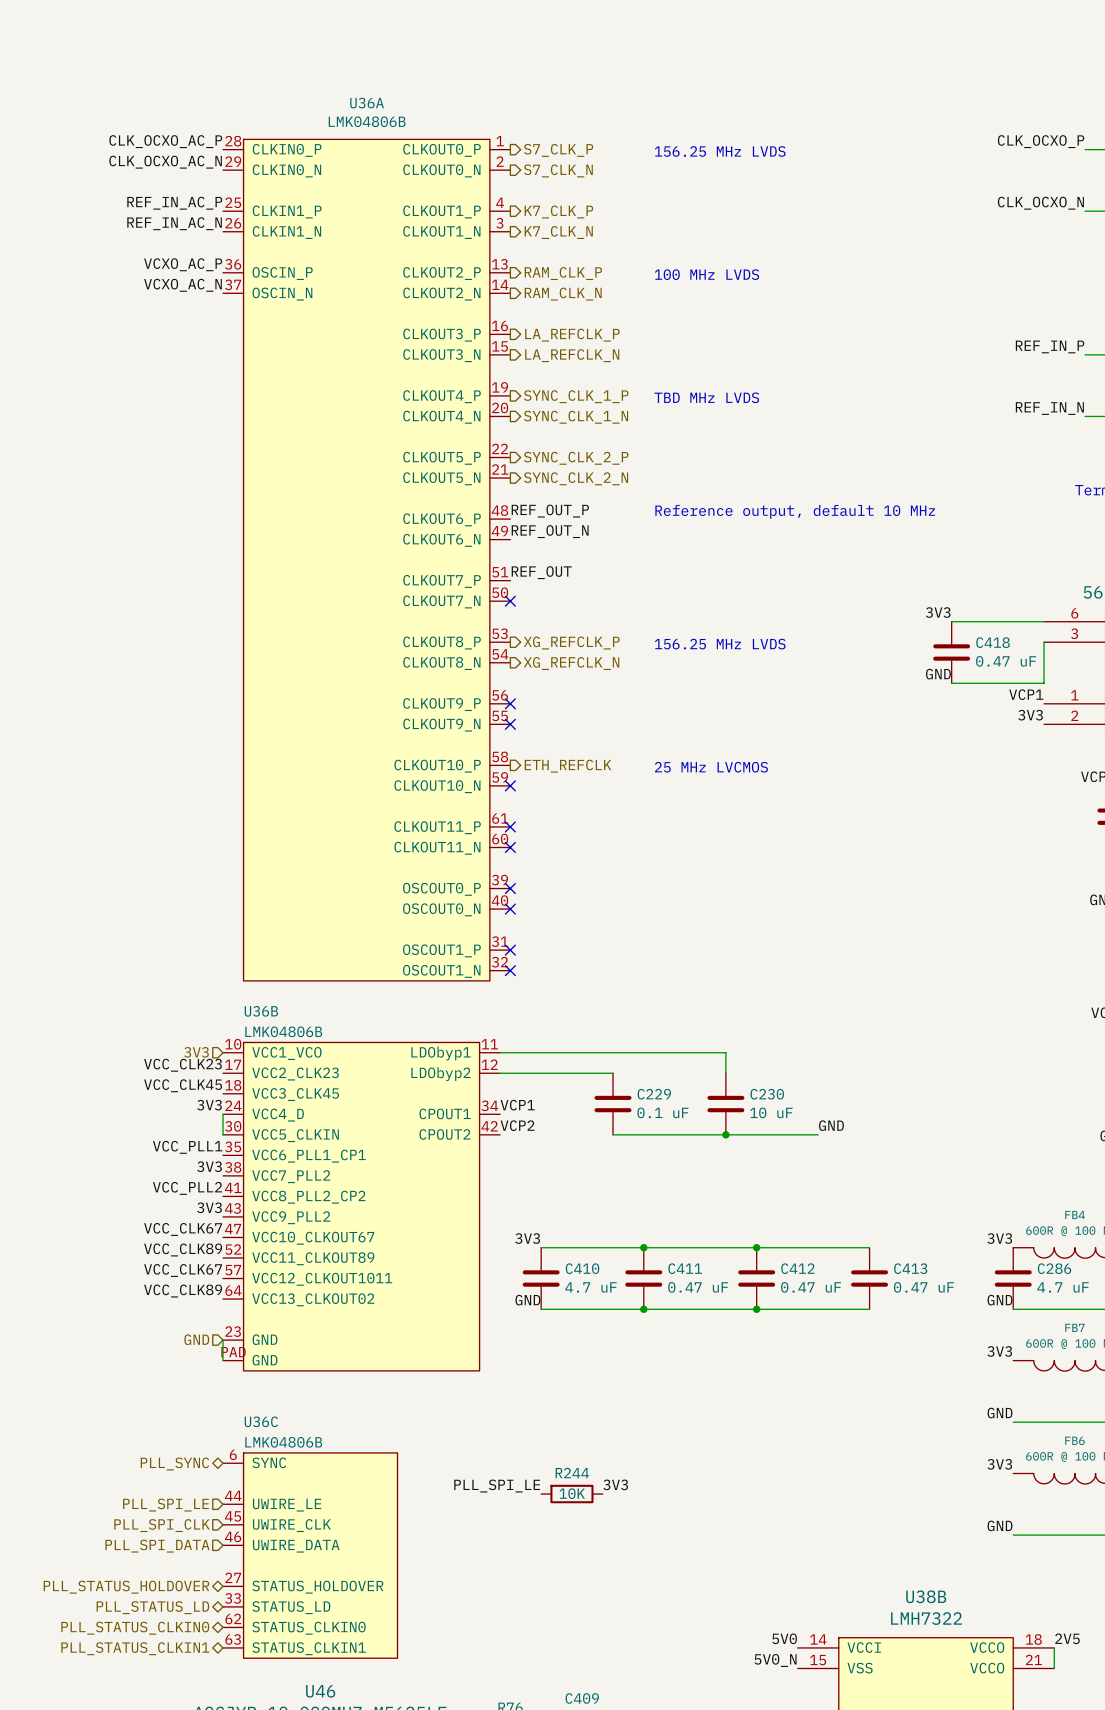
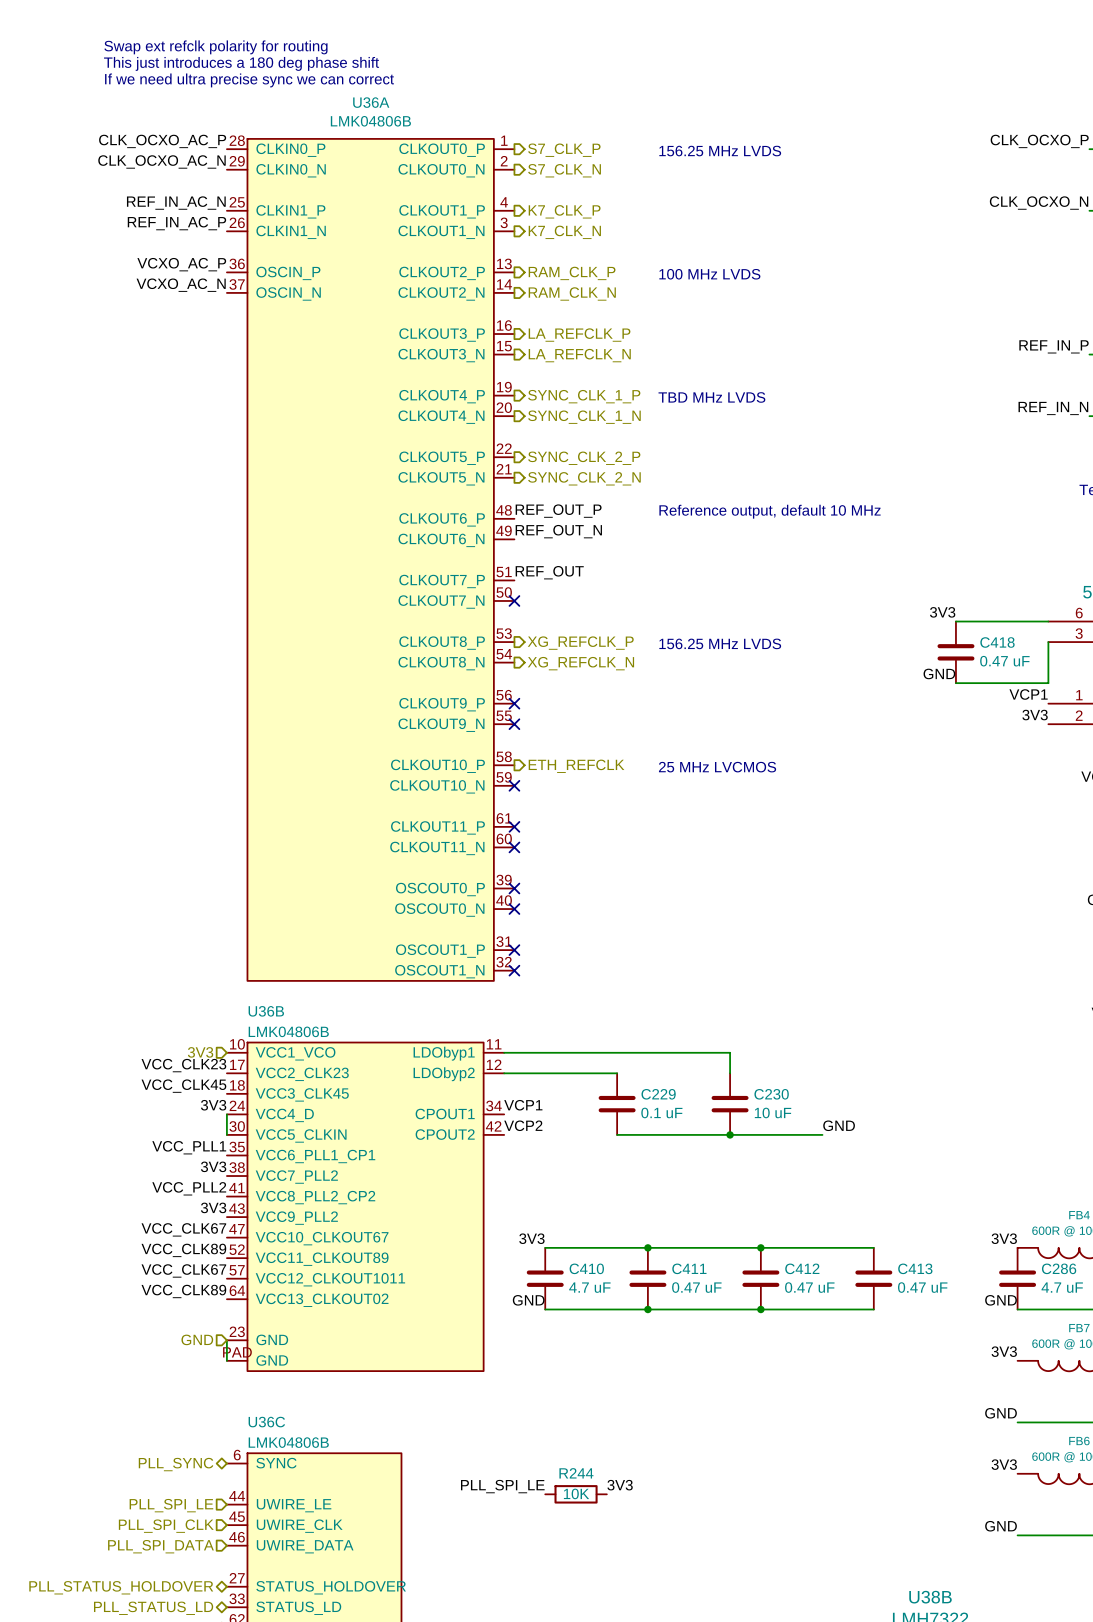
text: none -> Swap ext refclk polarity for routing (215, 47)
text: none -> This just introduces a 180 deg phase shift (241, 63)
text: none -> If we need ultra precise sync we can correct (249, 80)
label: REF_IN_AC_P (174, 203) -> REF_IN_AC_N (176, 203)
label: REF_IN_AC_N (174, 223) -> REF_IN_AC_P (176, 223)

